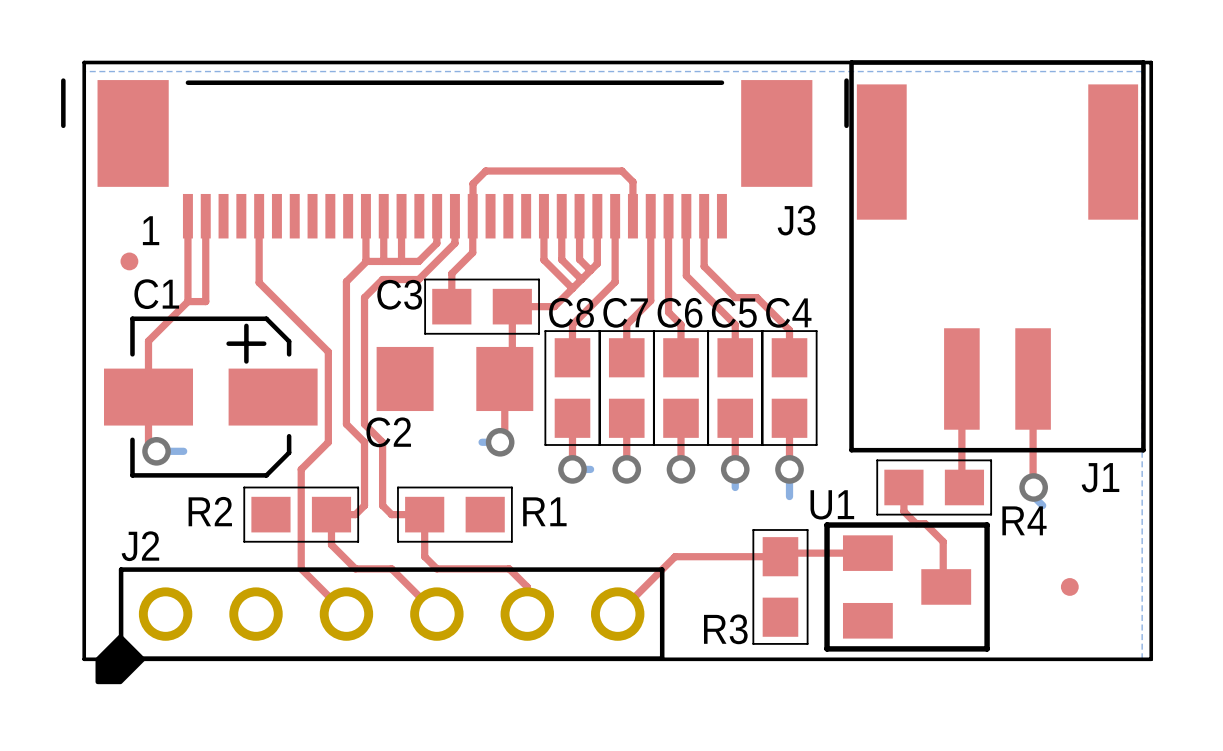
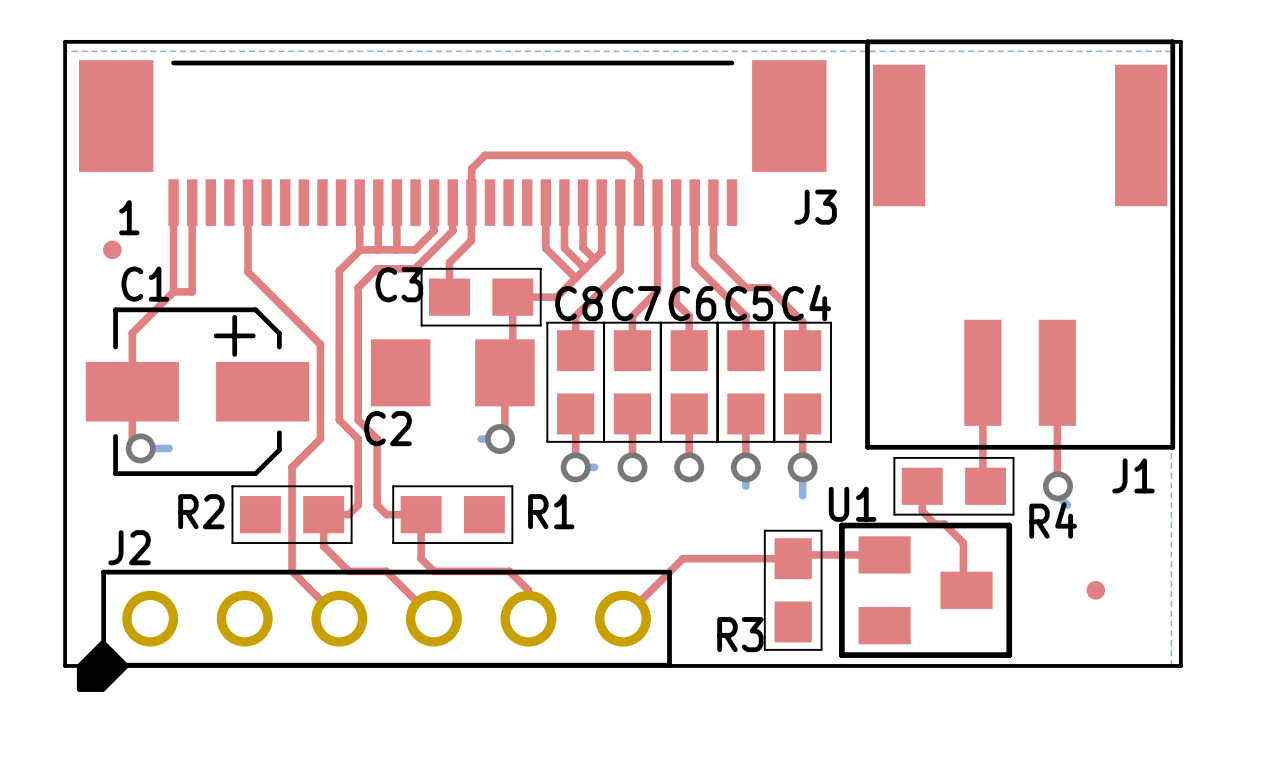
J3 footprint: [61, 78, 849, 239] -> [79, 60, 827, 226]

